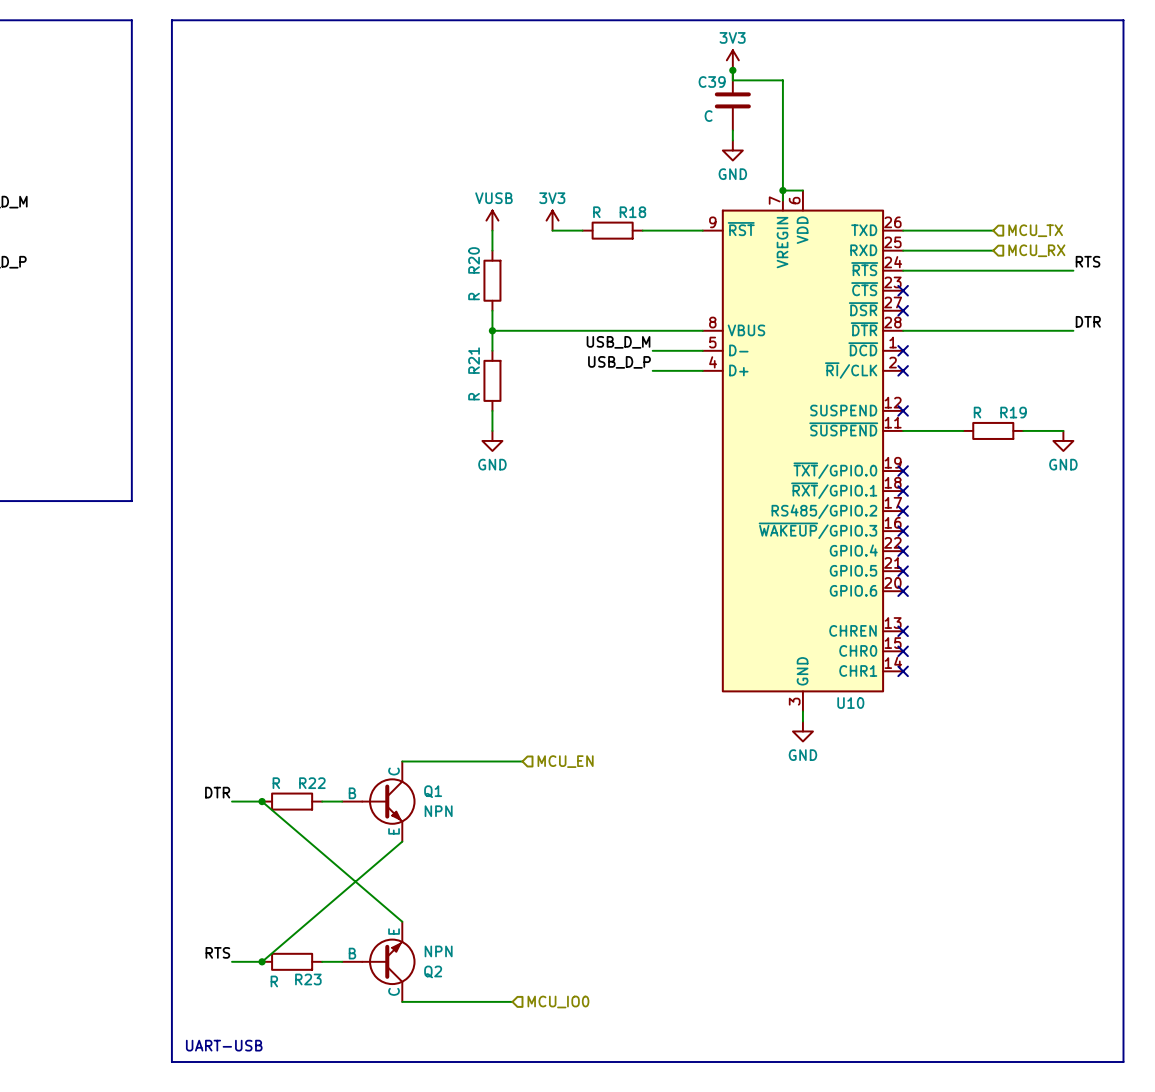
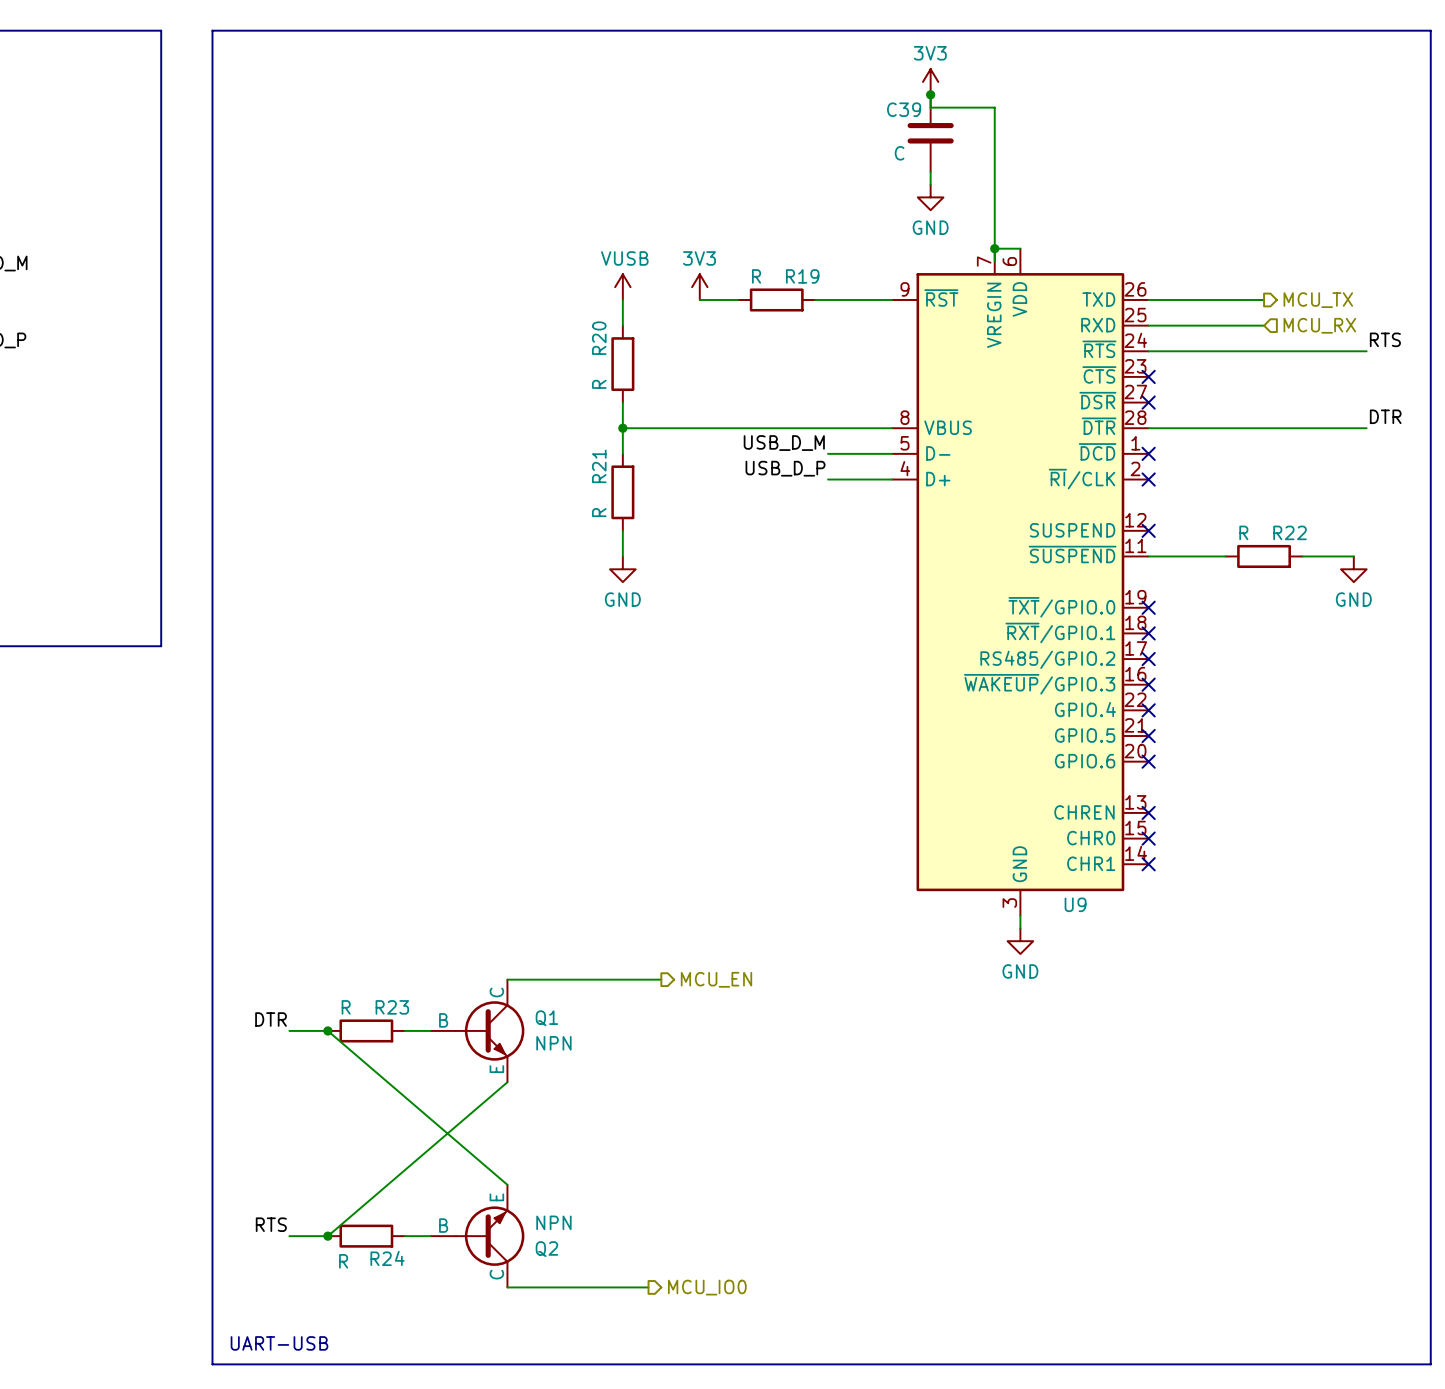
R18 name: R18 (632, 212) -> R19 (802, 276)
hierarchical label shape: input (1035, 230) -> output (1318, 300)
R19 name: R19 (1013, 412) -> R22 (1290, 532)
U10 name: U10 (850, 703) -> U9 (1075, 904)
hierarchical label shape: input (565, 761) -> output (716, 979)
R22 name: R22 (312, 783) -> R23 (392, 1007)
R23 name: R23 (308, 979) -> R24 (387, 1258)
hierarchical label shape: input (558, 1002) -> output (707, 1287)

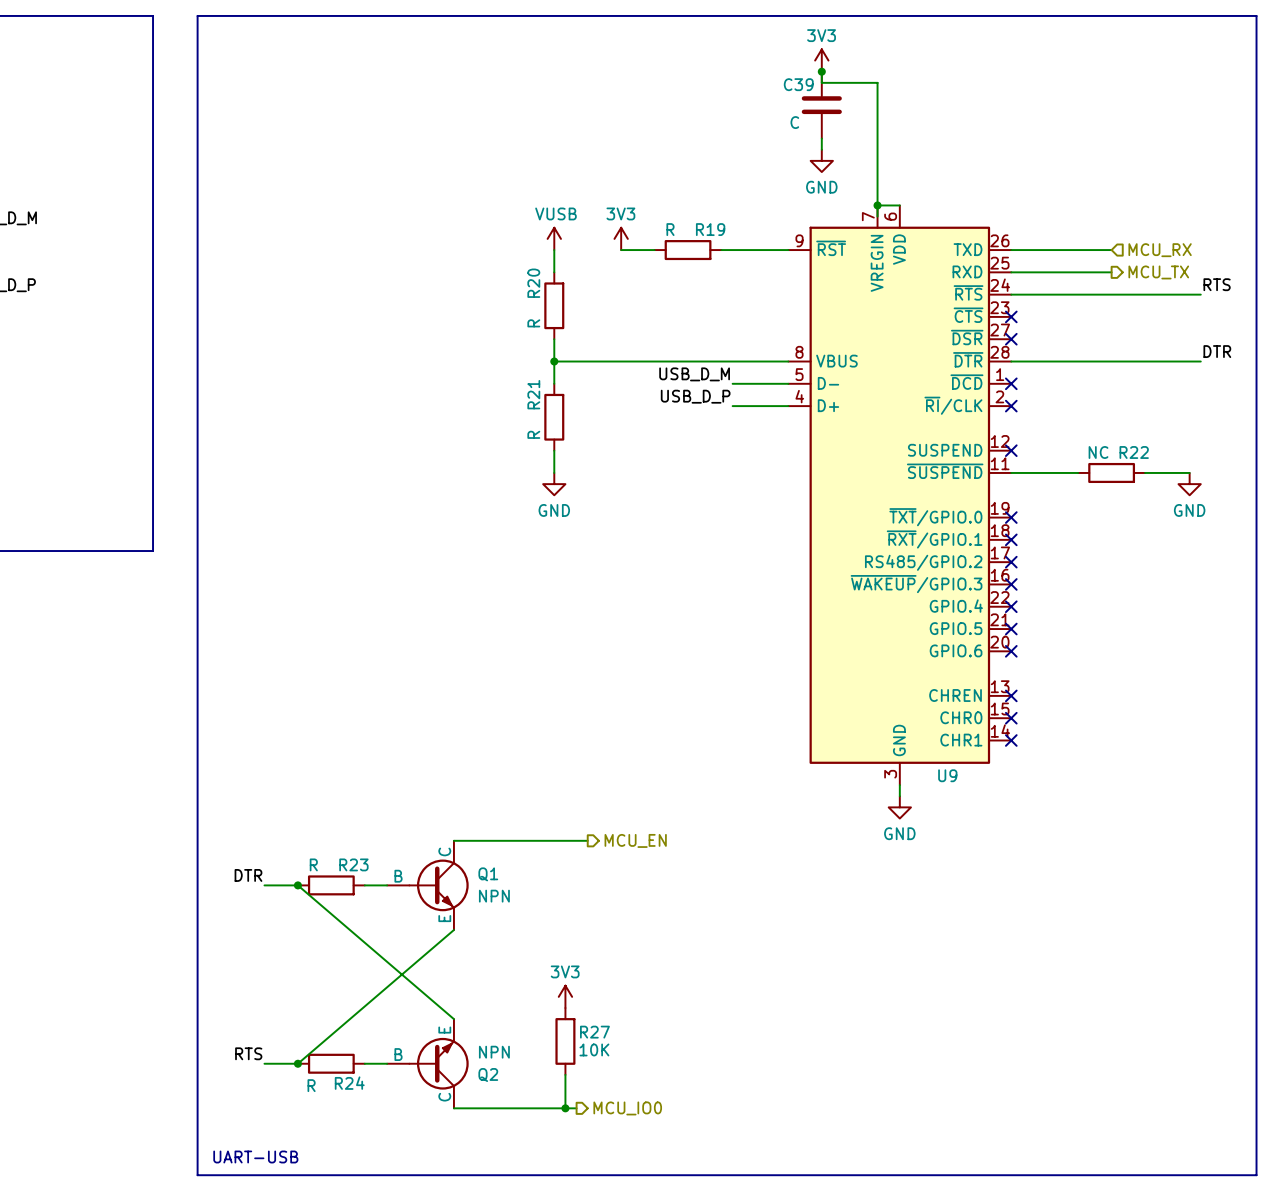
hierarchical label shape: output (1318, 300) -> input (1160, 250)
hierarchical label: MCU_TX (1318, 300) -> MCU_RX (1160, 250)
hierarchical label shape: input (1319, 325) -> output (1158, 272)
hierarchical label: MCU_RX (1319, 325) -> MCU_TX (1158, 272)
R22 value: R (1243, 532) -> NC (1098, 452)
power symbol: none -> 3V3 (565, 996)
R27: none -> 10K (565, 1041)
wire: none -> (565, 1074) (565, 1108)
junction: none -> (565, 1108)

